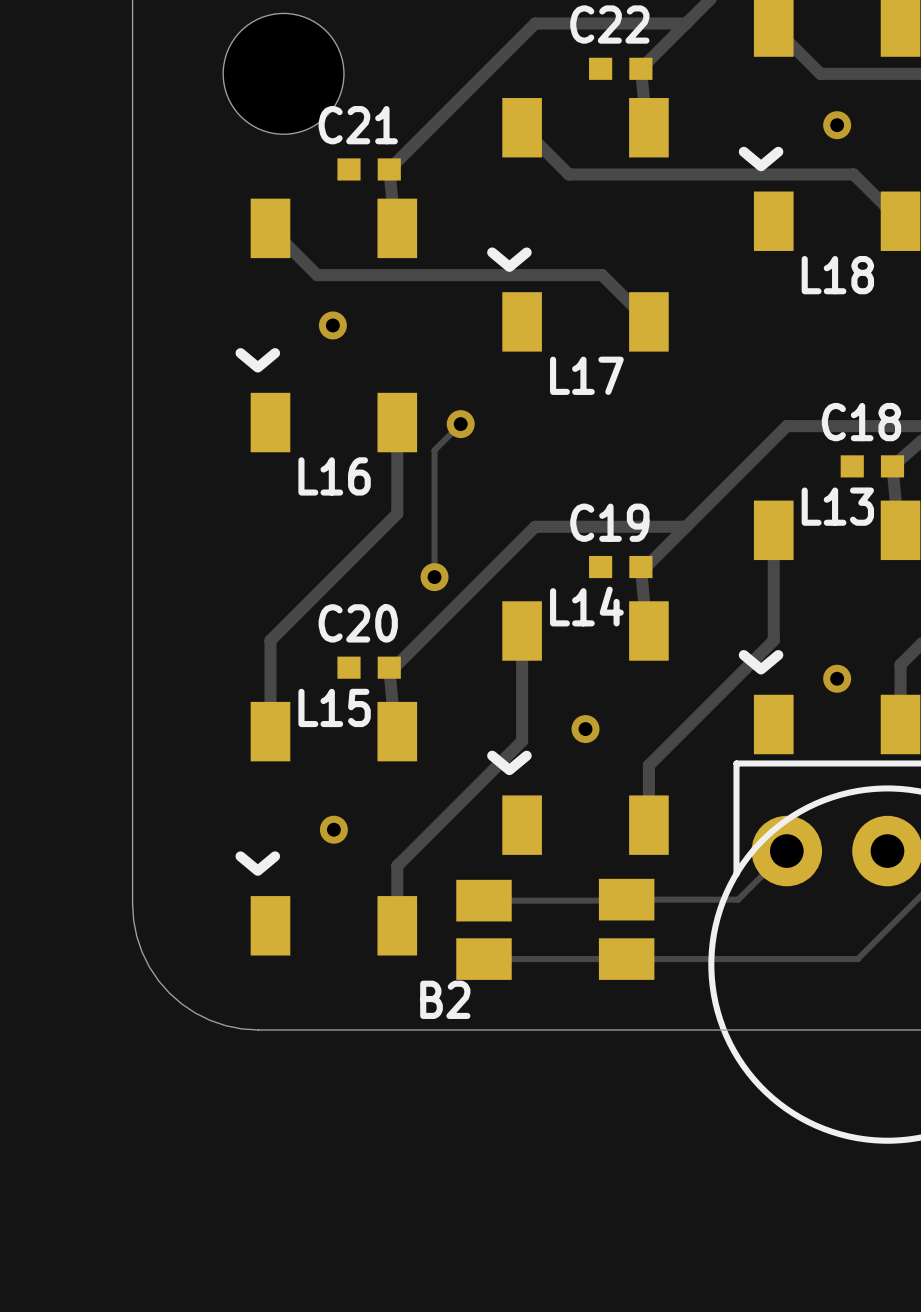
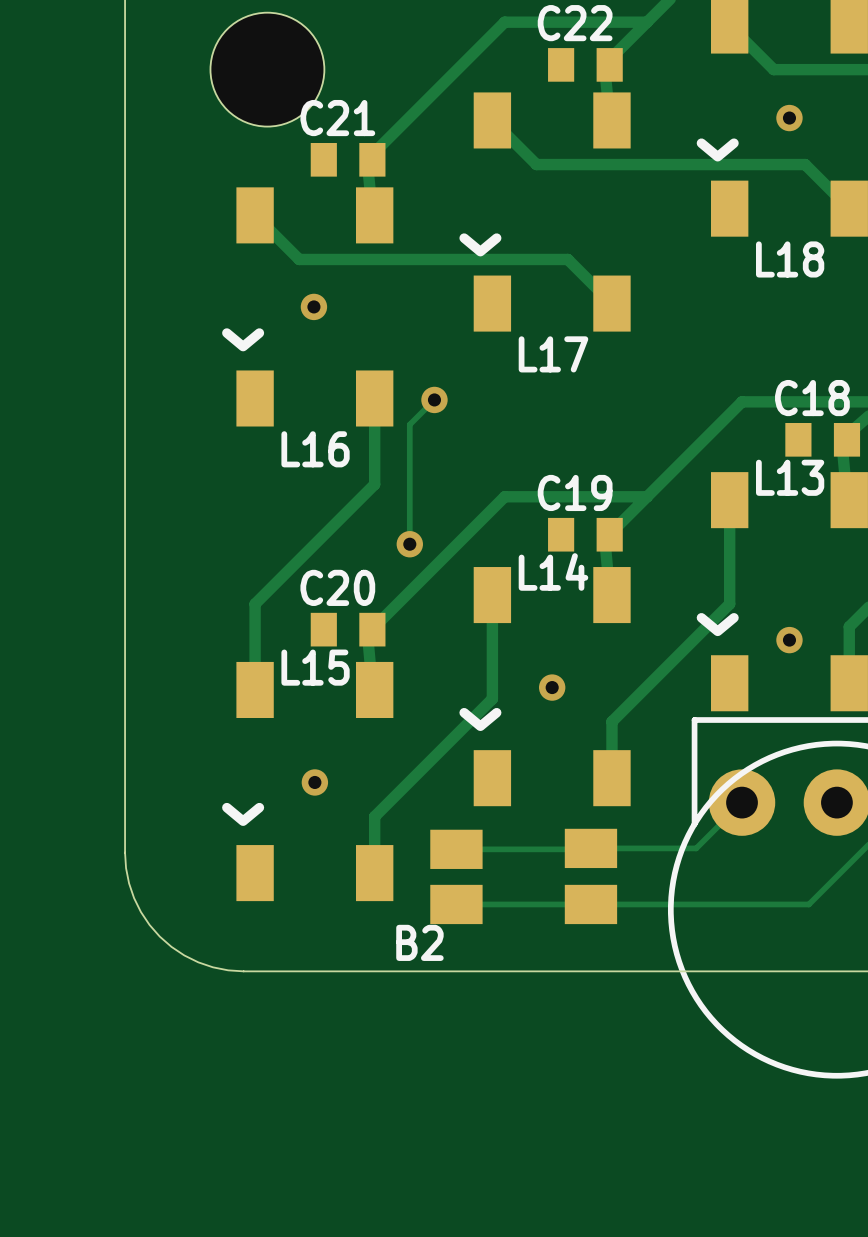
C22 footprint: [589, 57, 653, 80] -> [548, 48, 623, 82]
C21 footprint: [337, 158, 401, 181] -> [310, 142, 386, 177]
C18 footprint: [840, 455, 905, 478] -> [785, 423, 861, 457]
C19 footprint: [589, 555, 653, 579] -> [548, 517, 623, 552]
C20 footprint: [337, 656, 401, 679] -> [310, 612, 386, 647]

